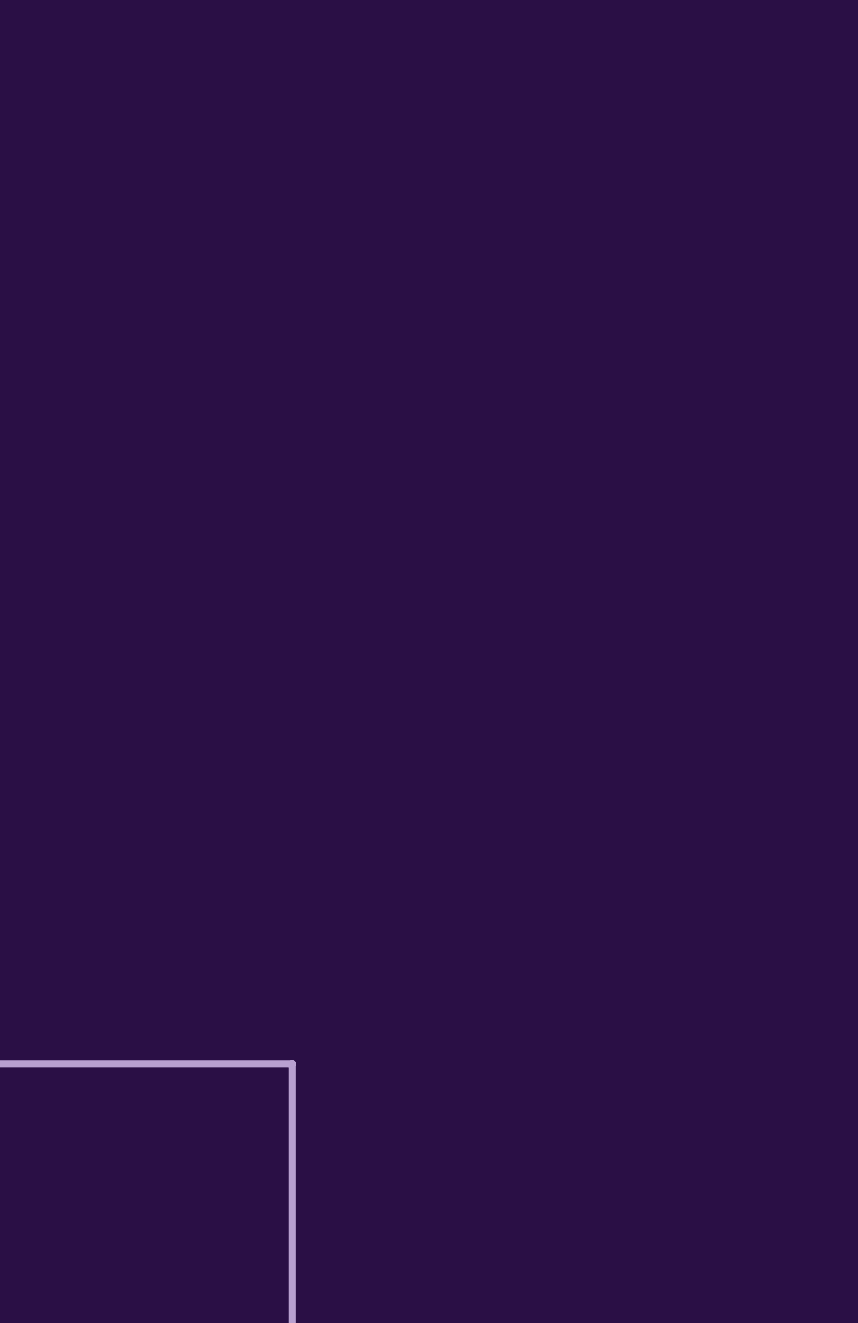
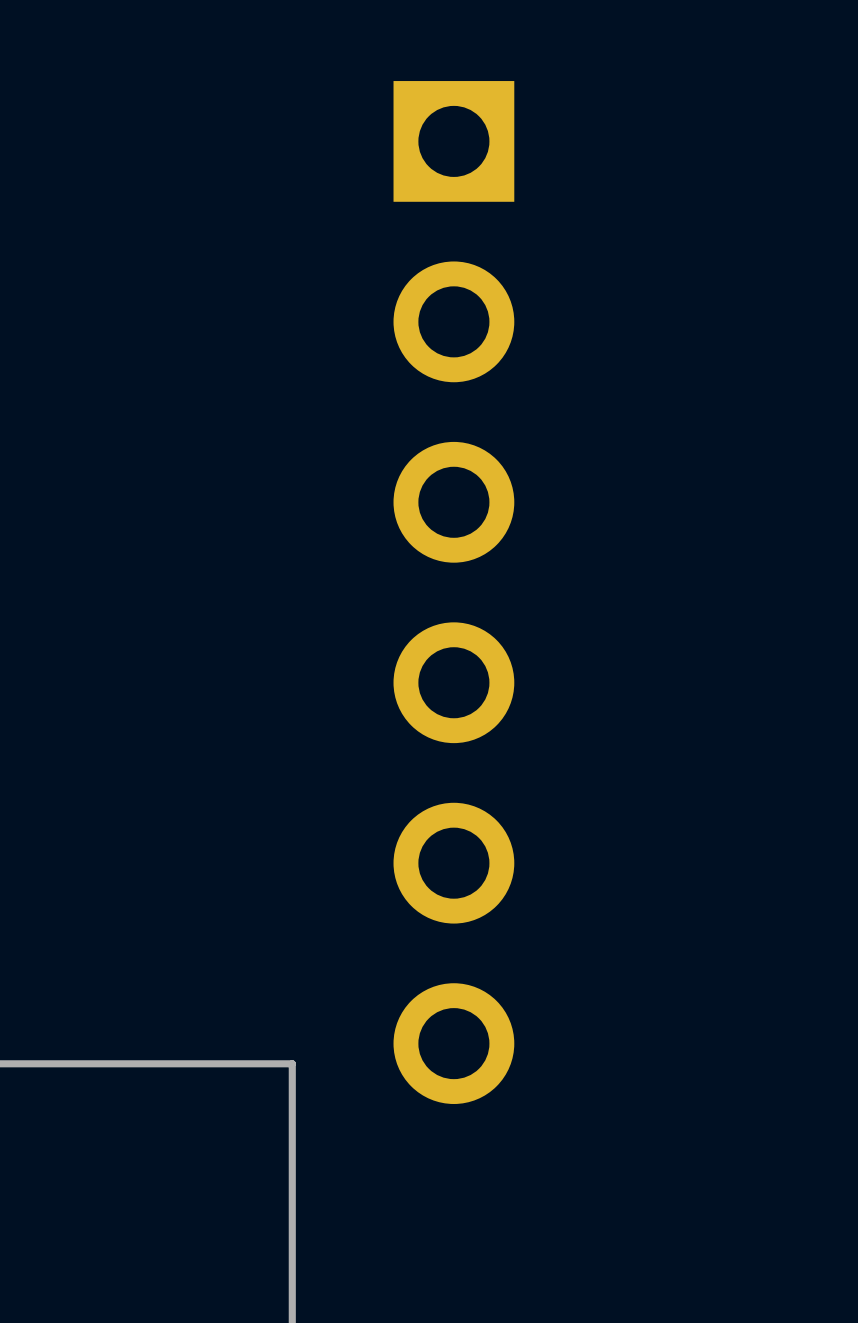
part: none -> (453, 592)

